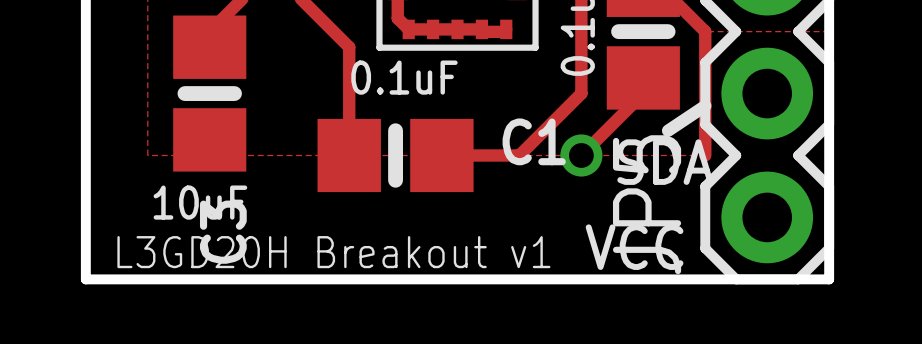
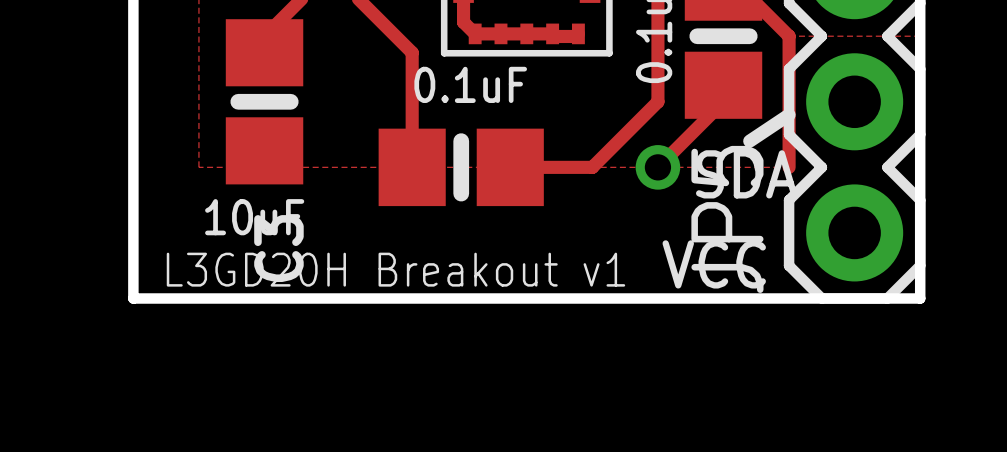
C1 name: C1 (534, 141) -> none

